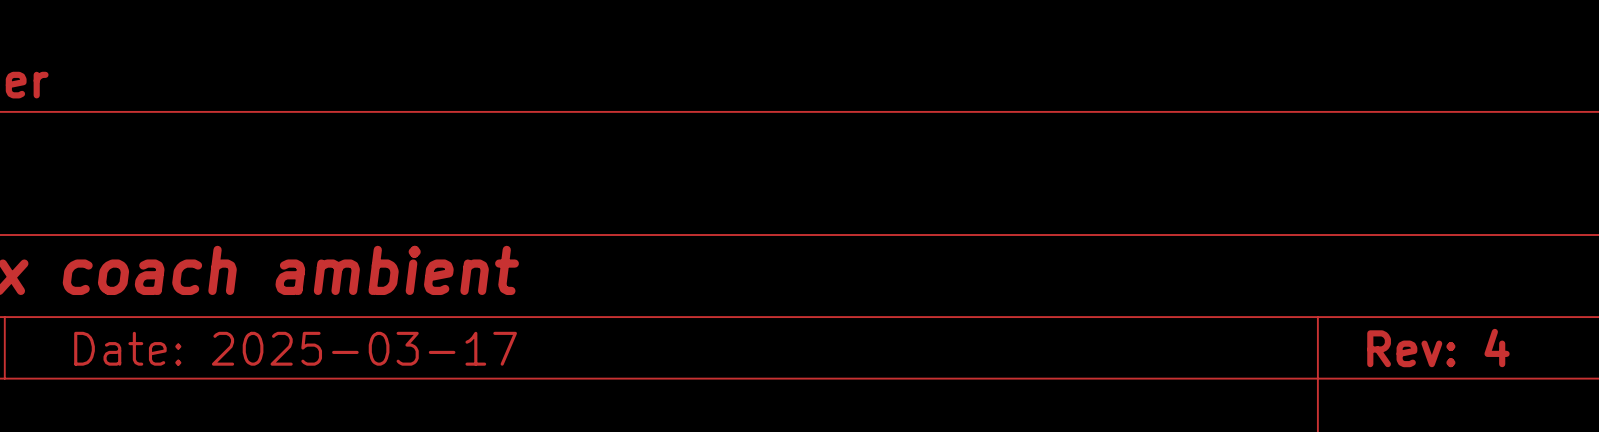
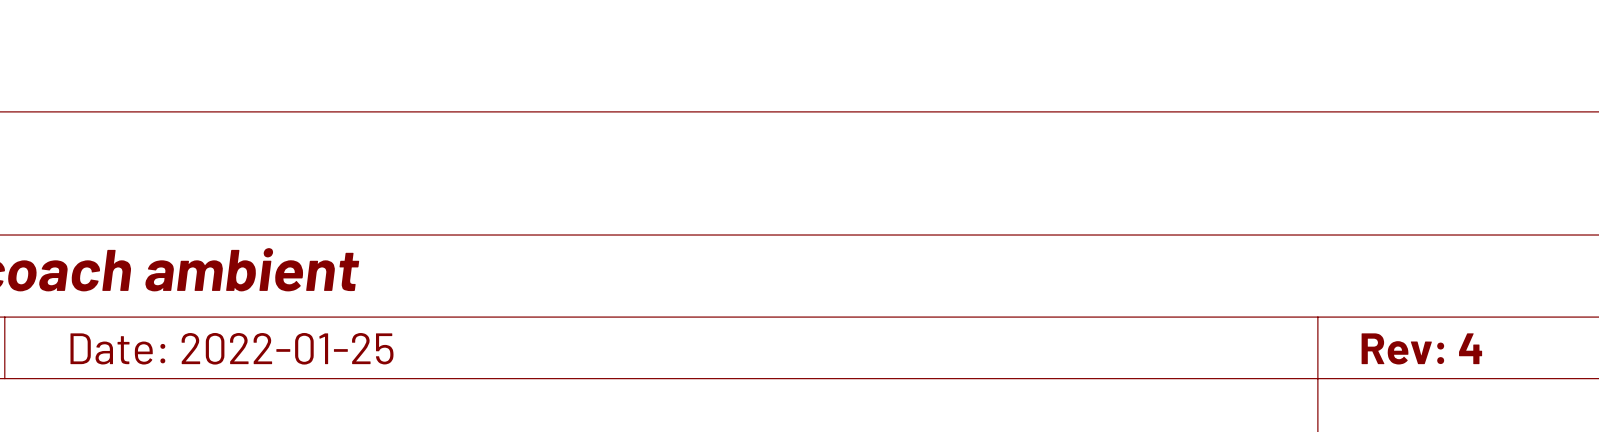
title block: Date: 2025-03-17 (295, 348) -> Date: 2022-01-25 (231, 348)

